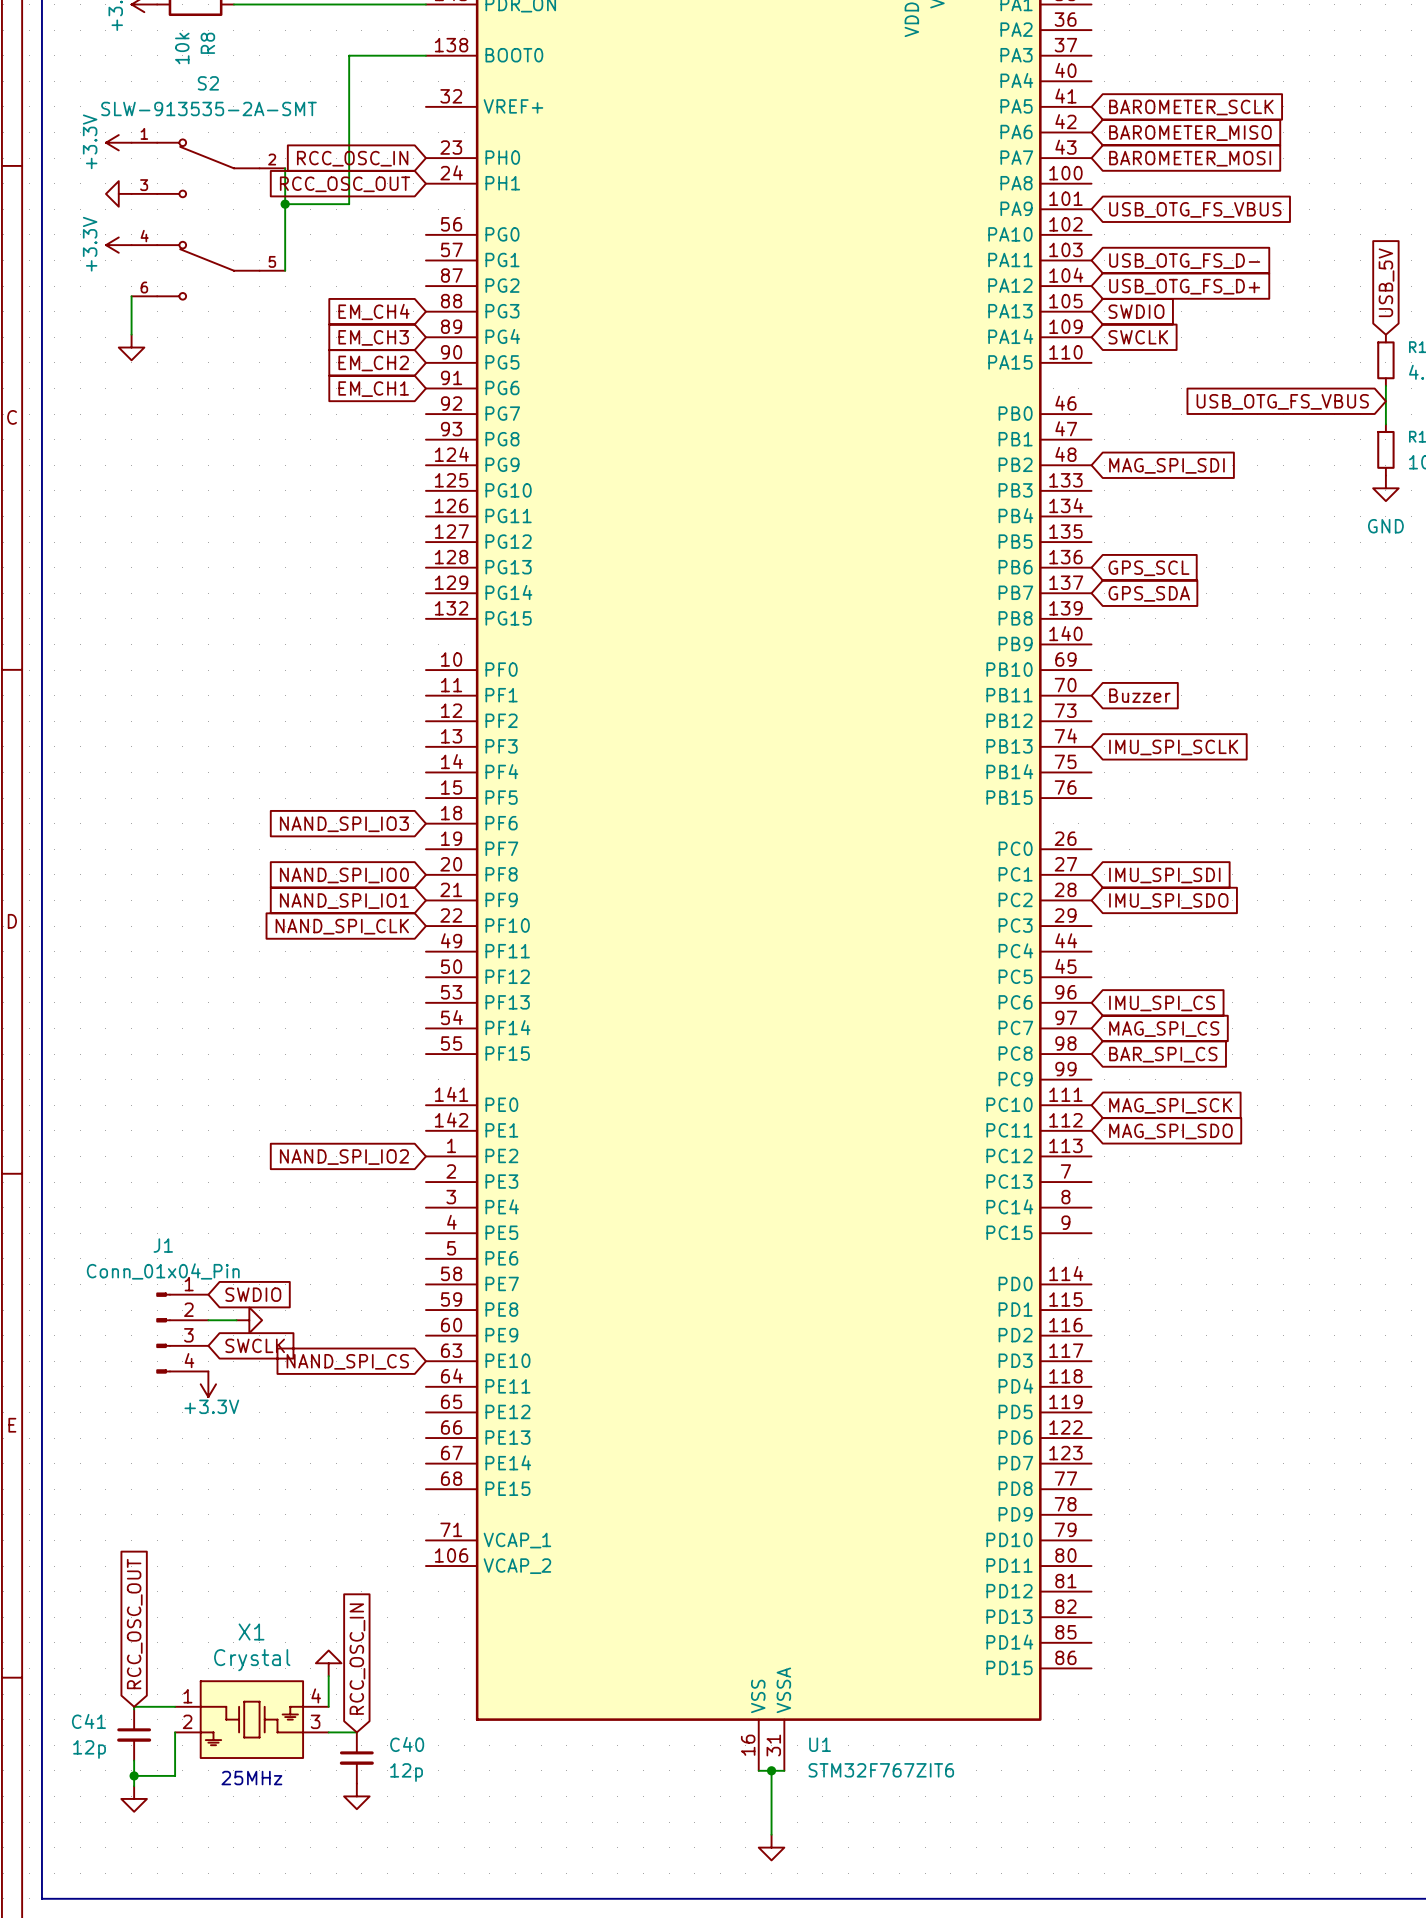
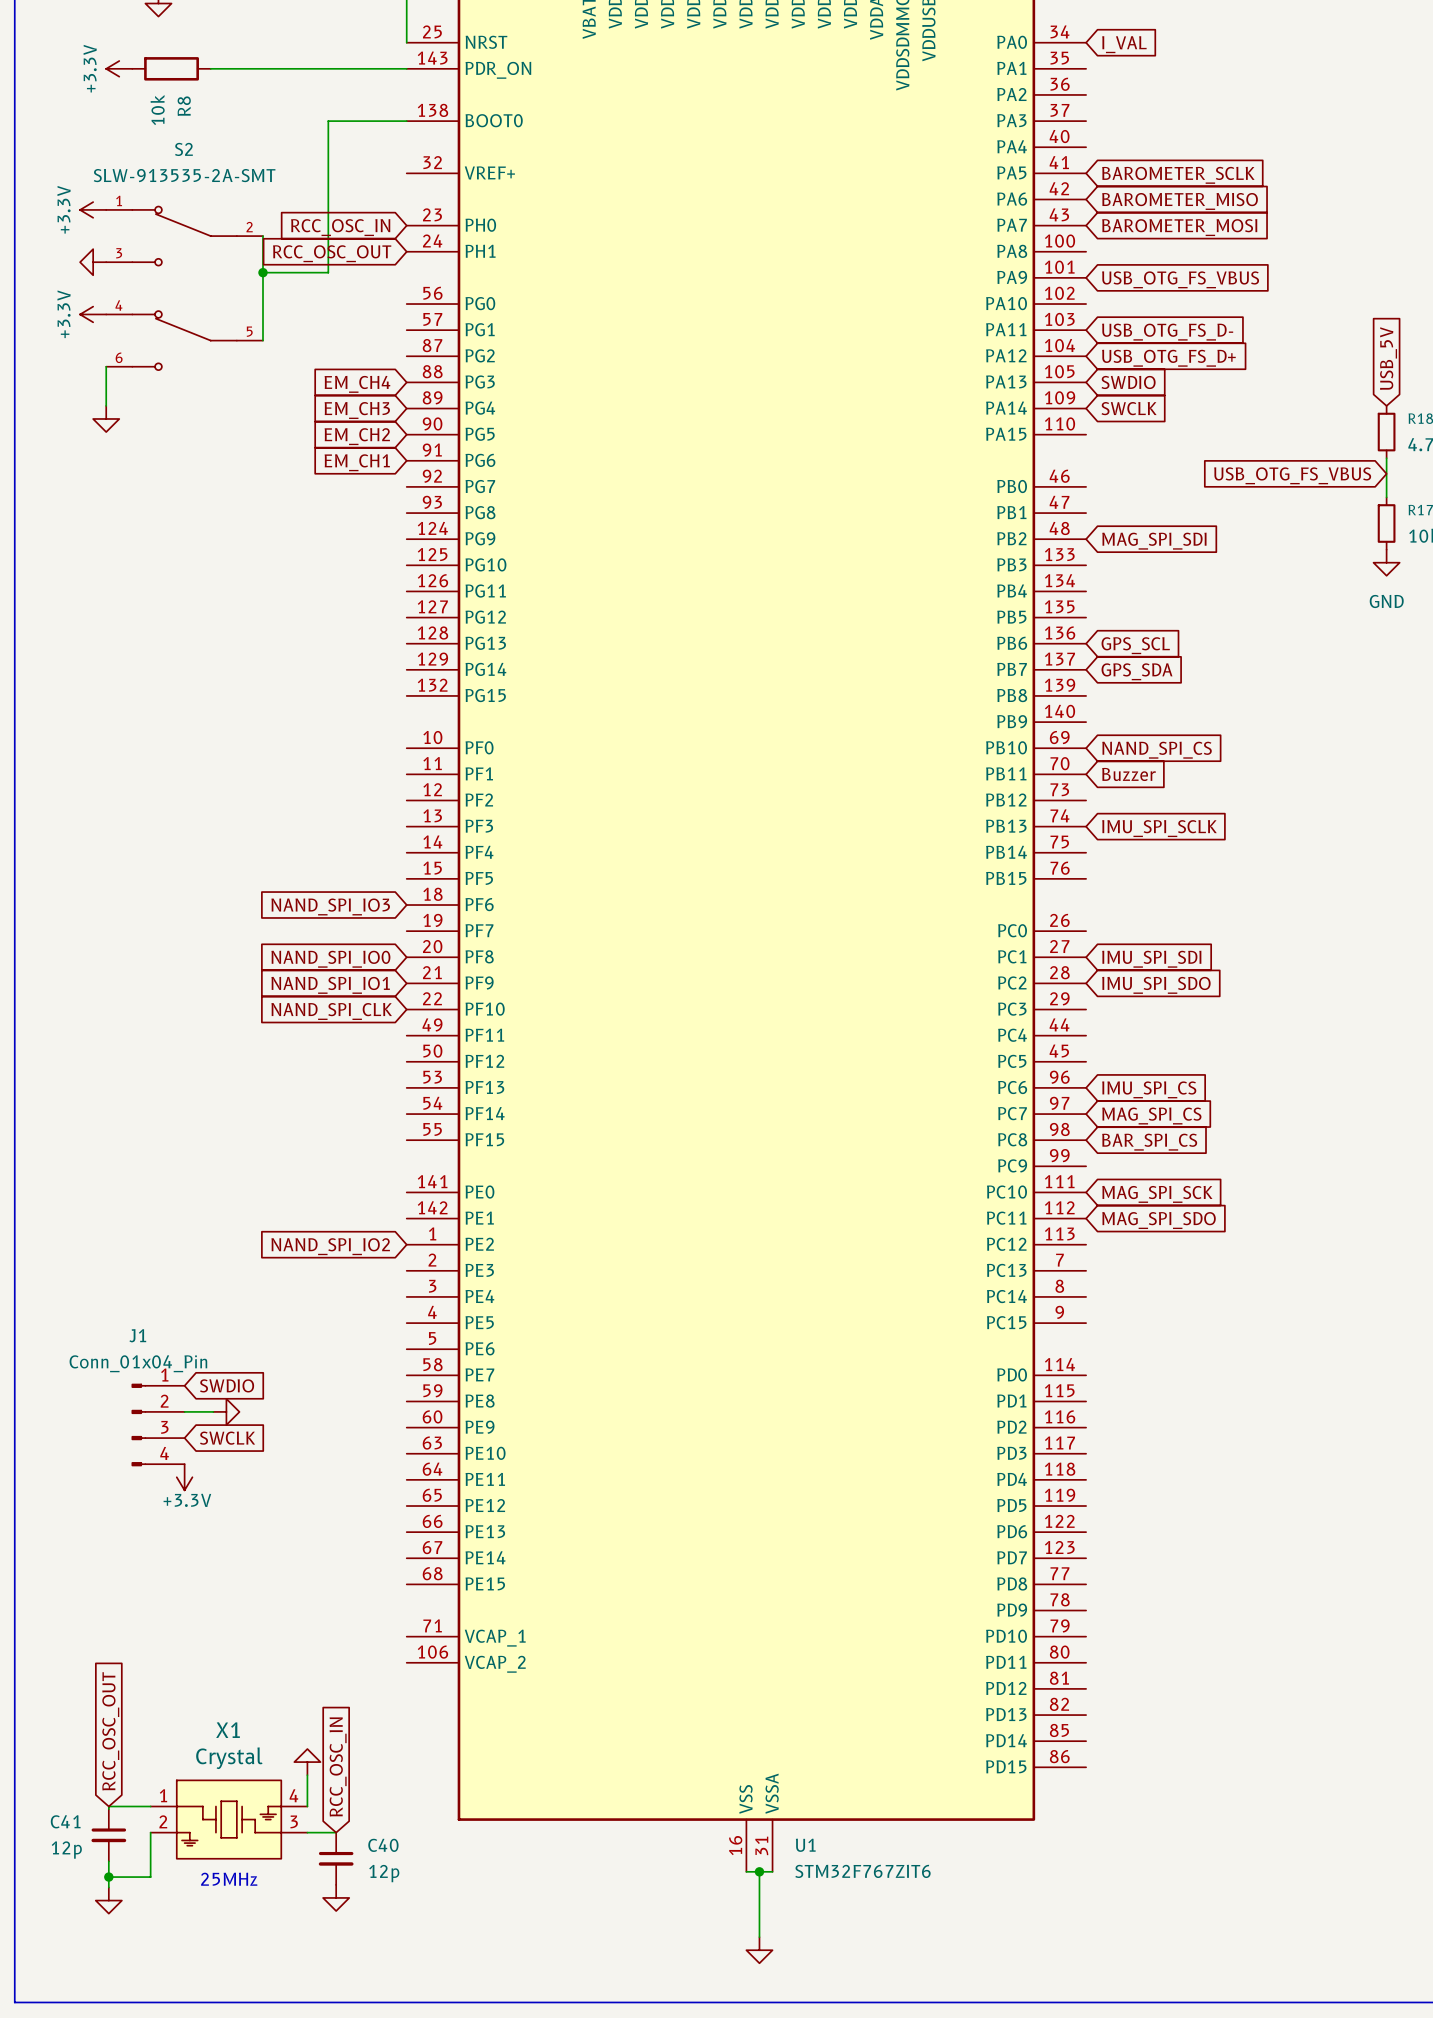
global label: none -> NAND_SPI_CS (1157, 750)
global label: NAND_SPI_CS (347, 1361) -> none

